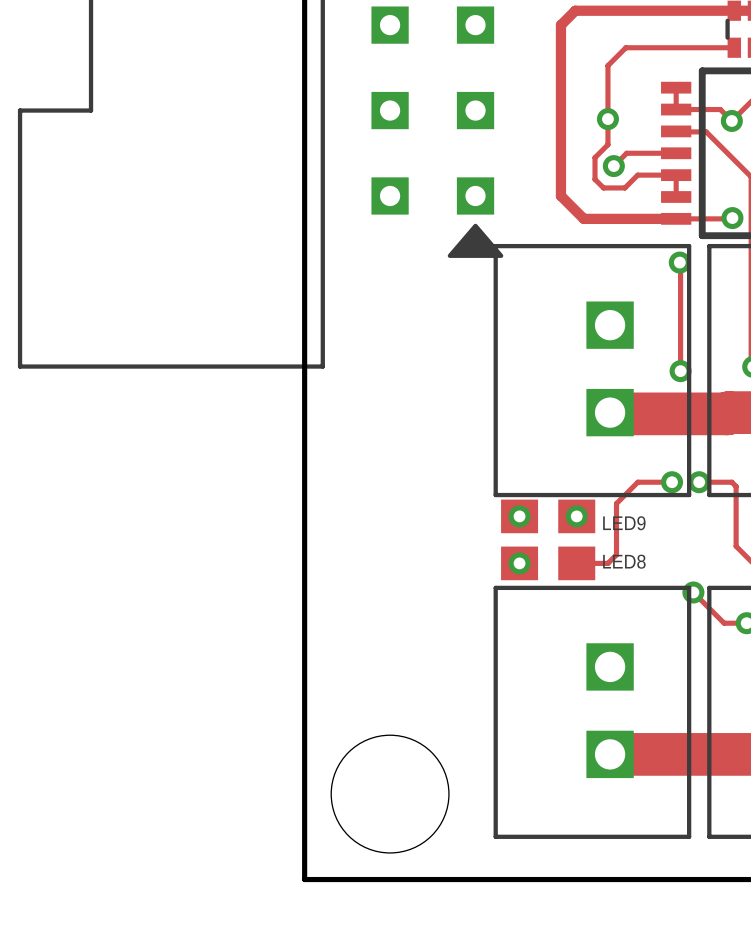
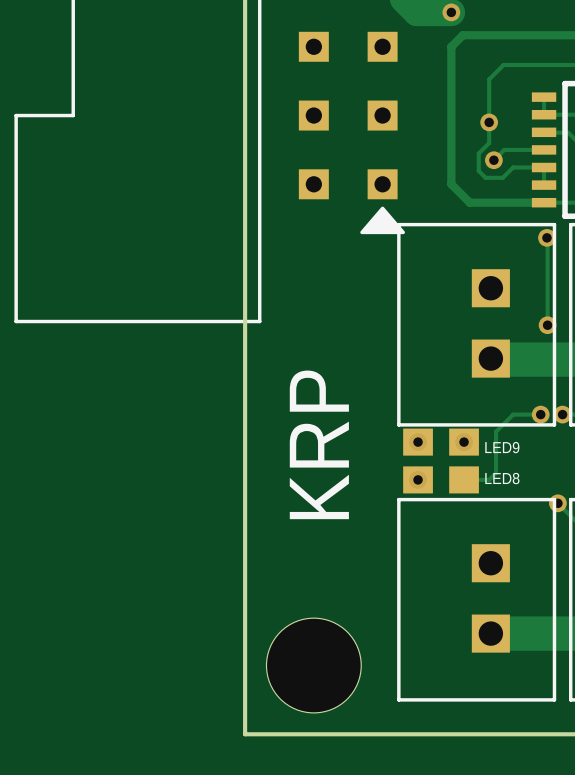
text: none -> KRP (319, 444)

